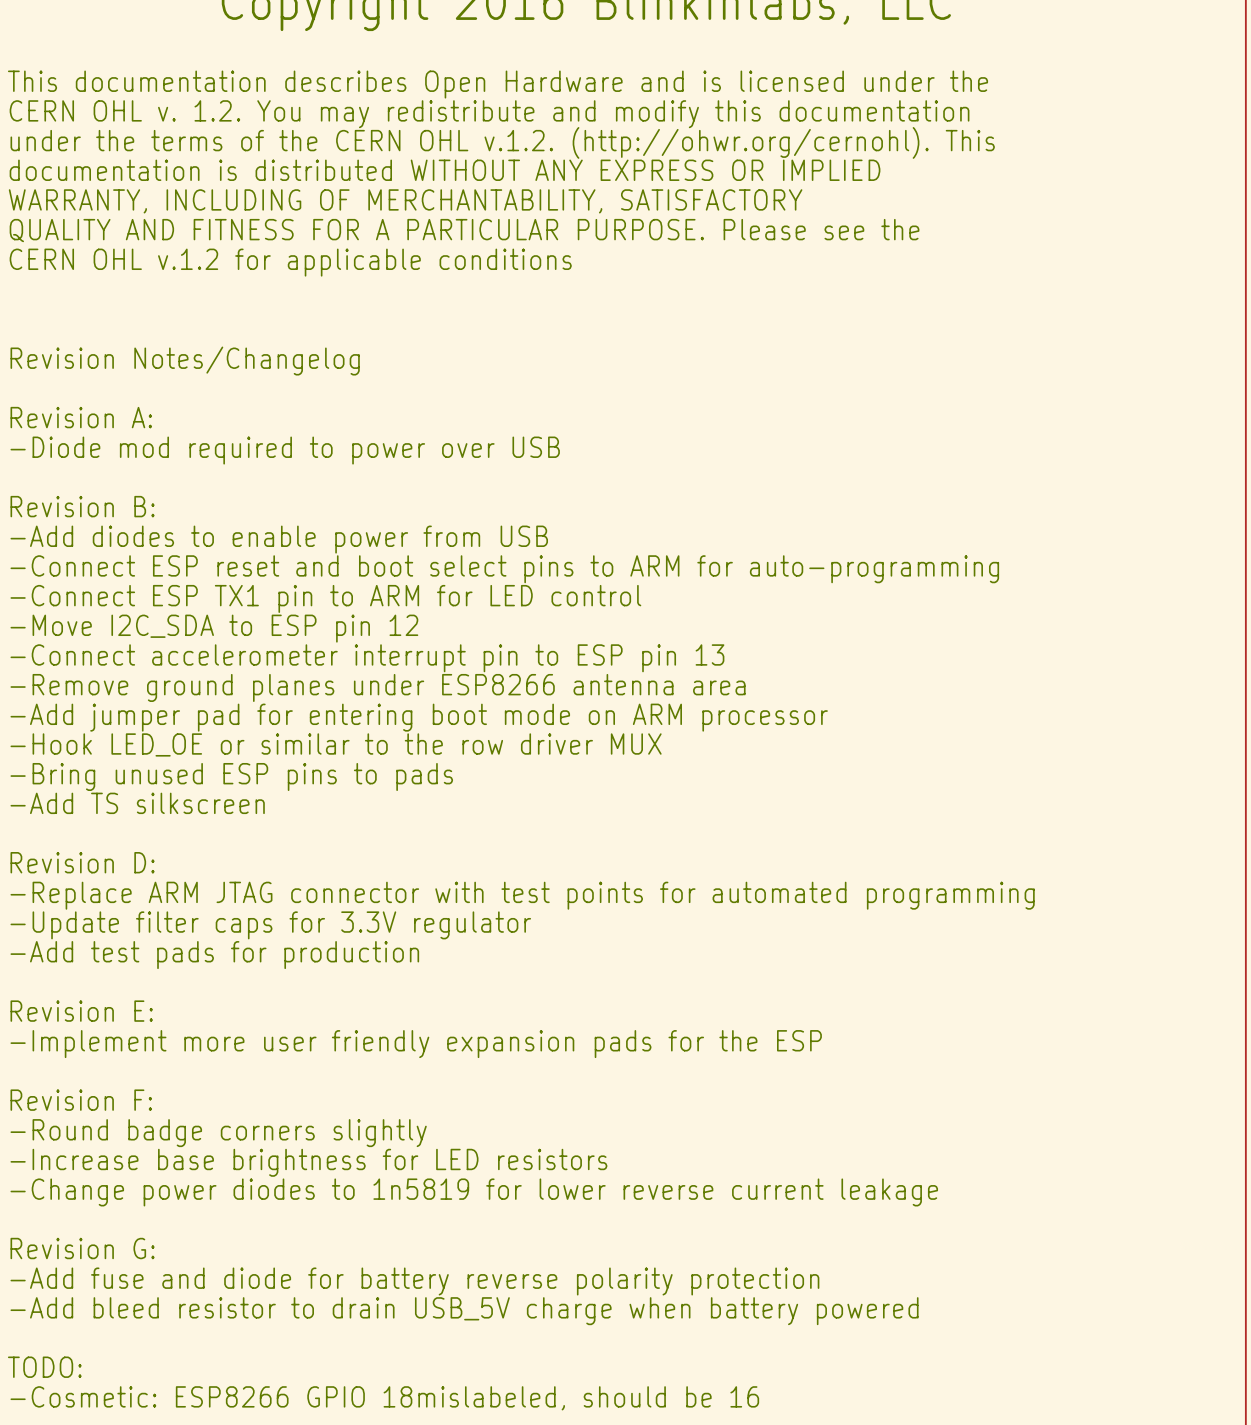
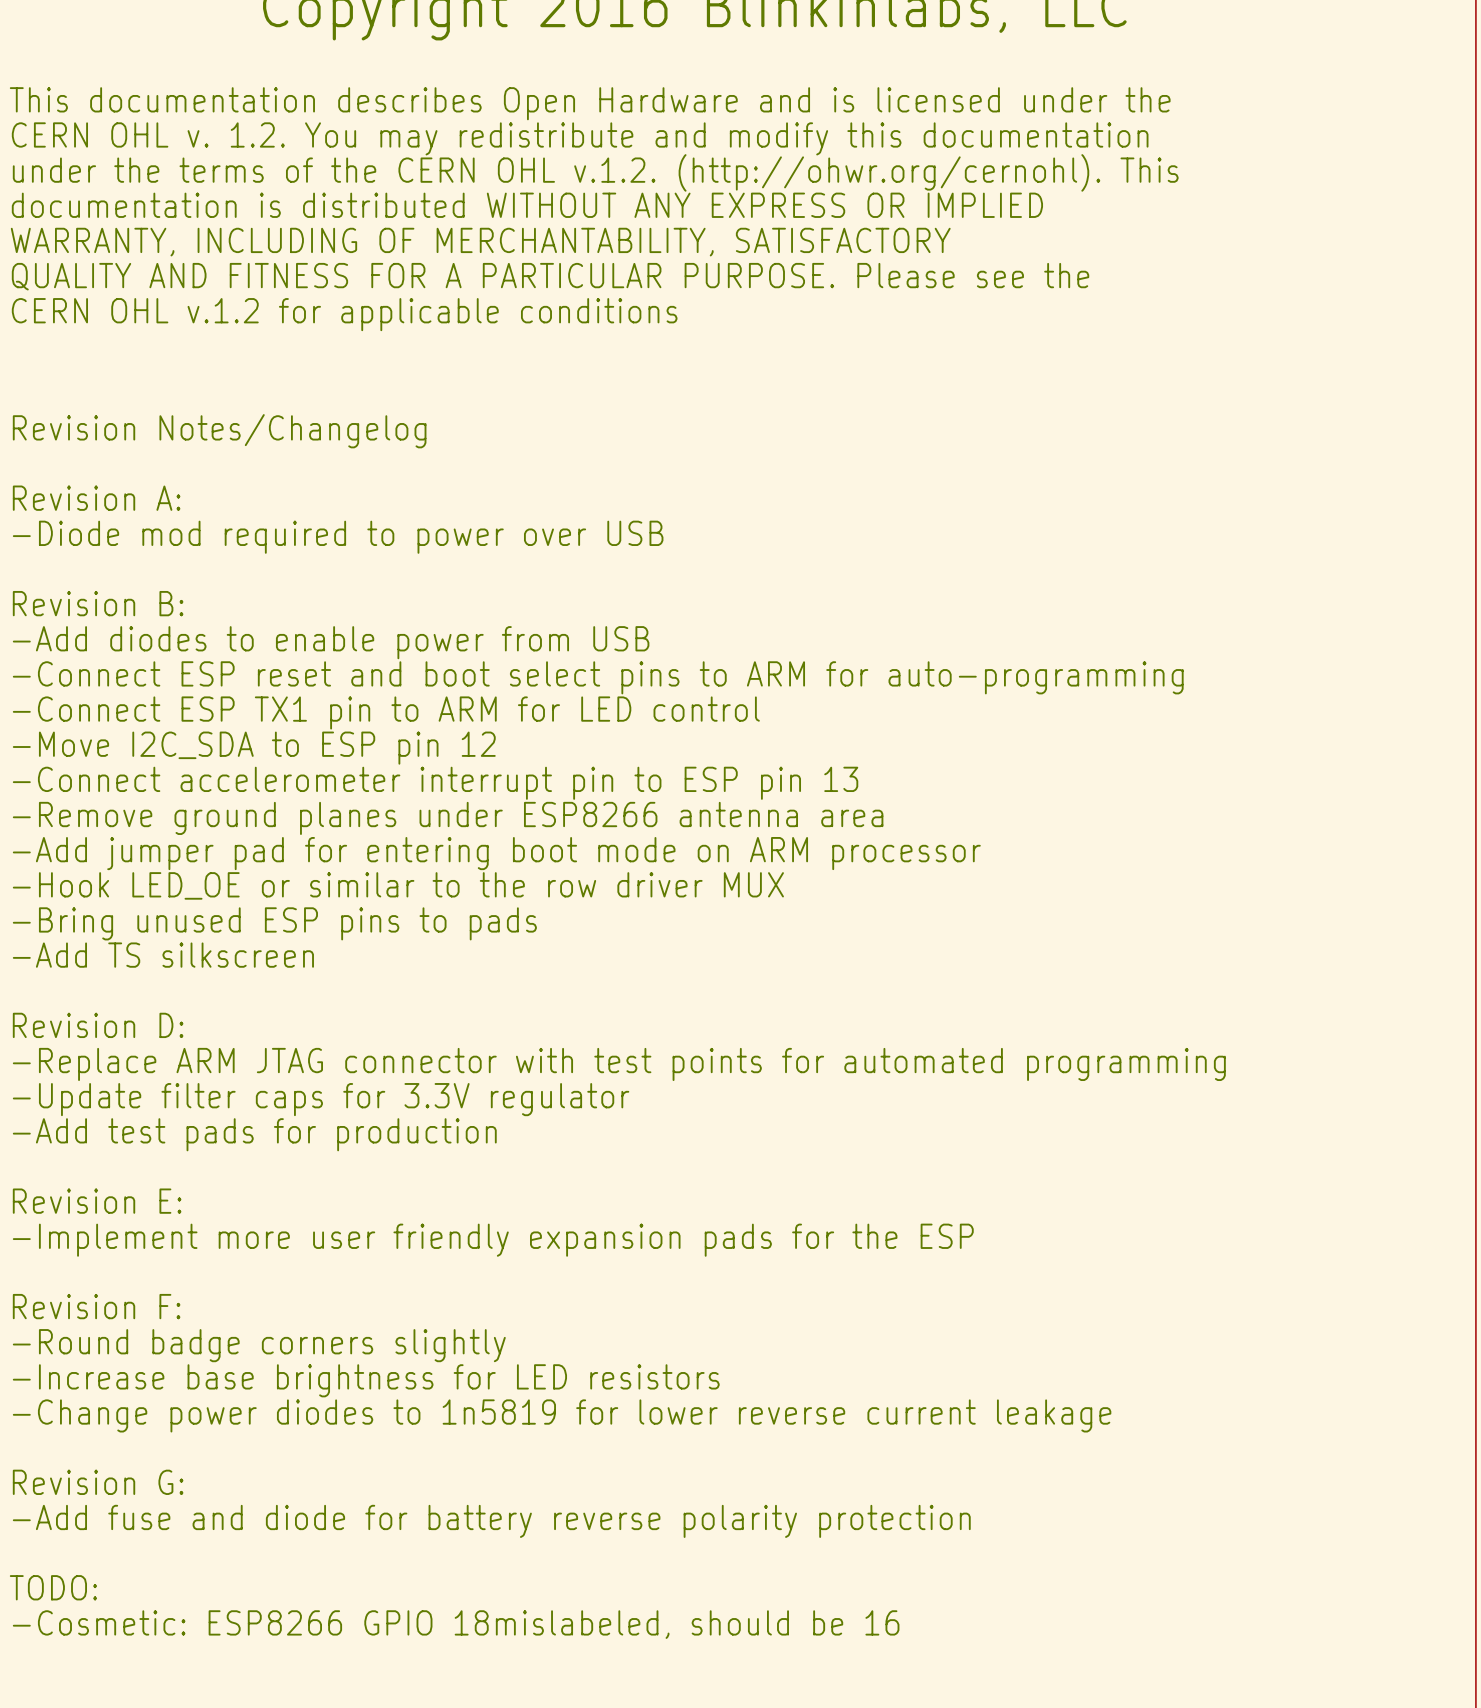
text: -Add bleed resistor to drain USB_5V charge when battery powered (464, 1311) -> none
text: none -> TODO: (53, 1587)
text: TODO: (44, 1367) -> -Cosmetic: ESP8266 GPIO 18mislabeled, should be 16 (456, 1624)
text: -Cosmetic: ESP8266 GPIO 18mislabeled, should be 16 (384, 1398) -> none

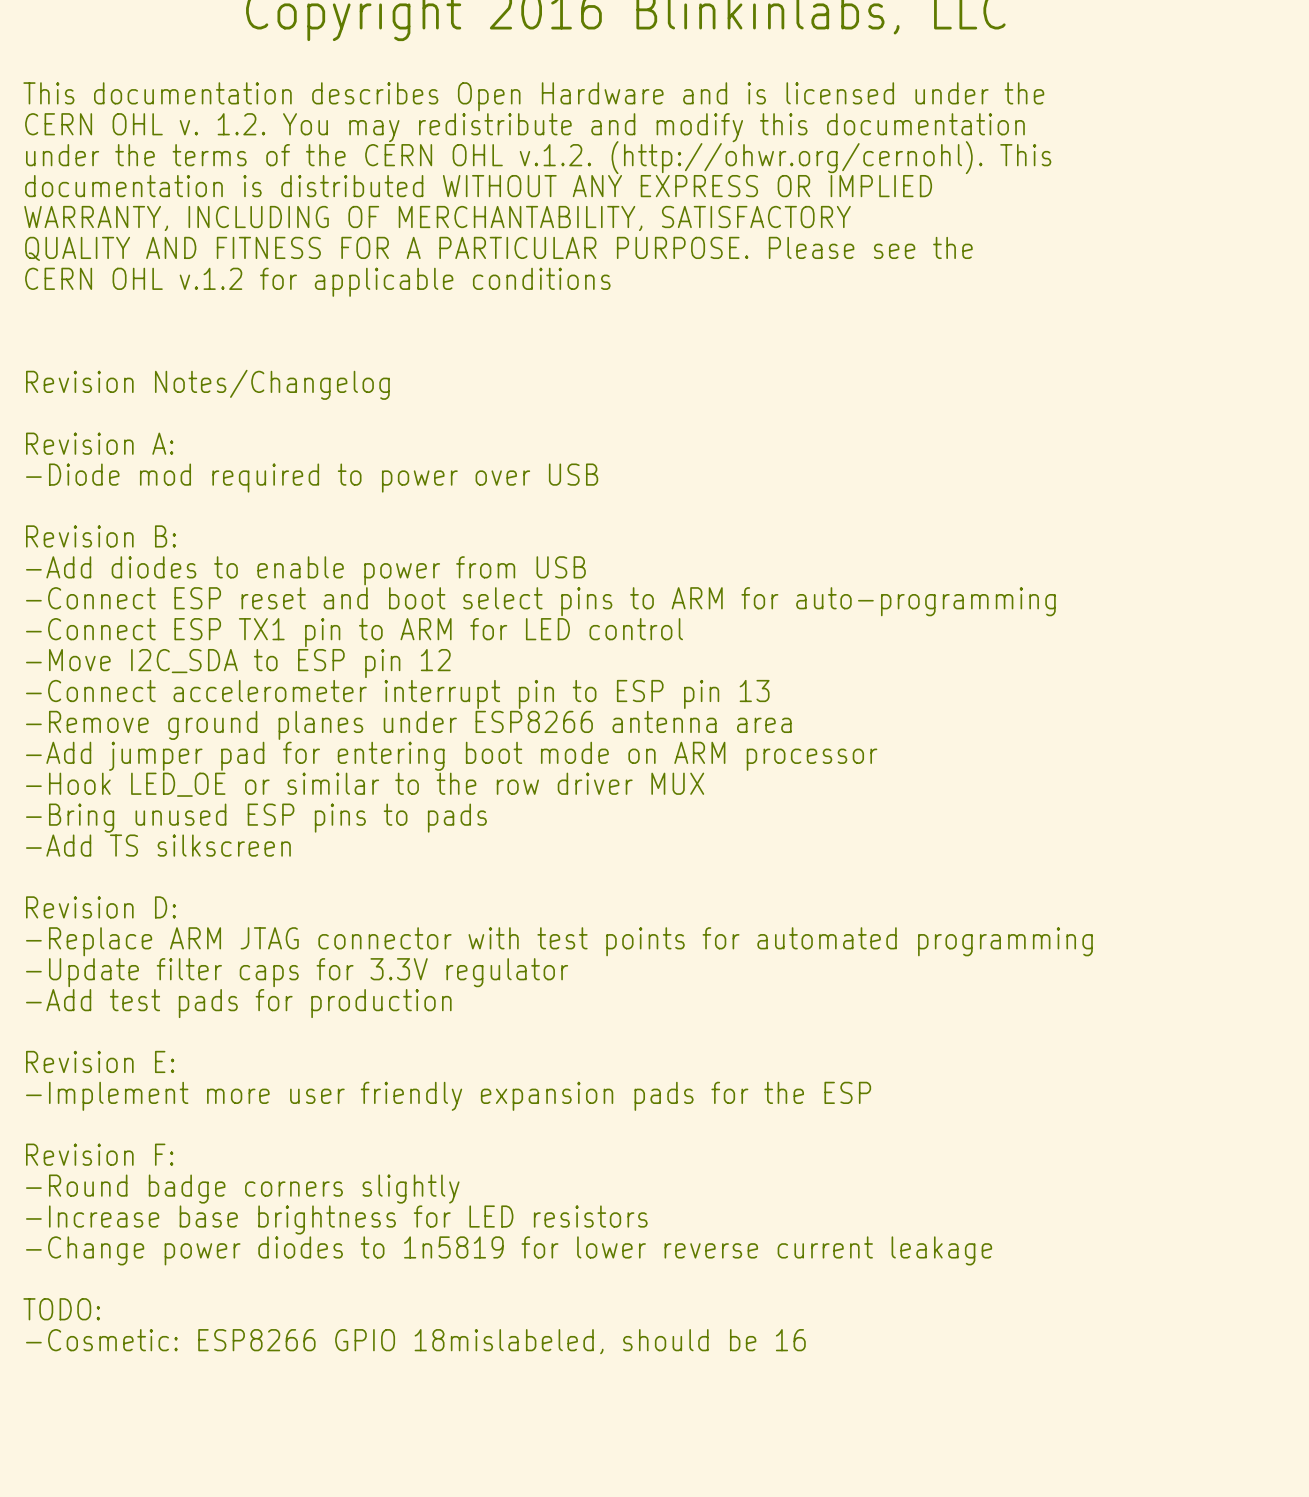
text: Revision G: (98, 1482) -> TODO: (61, 1309)
text: -Add fuse and diode for battery reverse polarity protection (491, 1521) -> -Cosmetic: ESP8266 GPIO 18mislabeled, should be 16 (415, 1341)
text: TODO: (53, 1587) -> none
text: -Cosmetic: ESP8266 GPIO 18mislabeled, should be 16 (456, 1624) -> none

